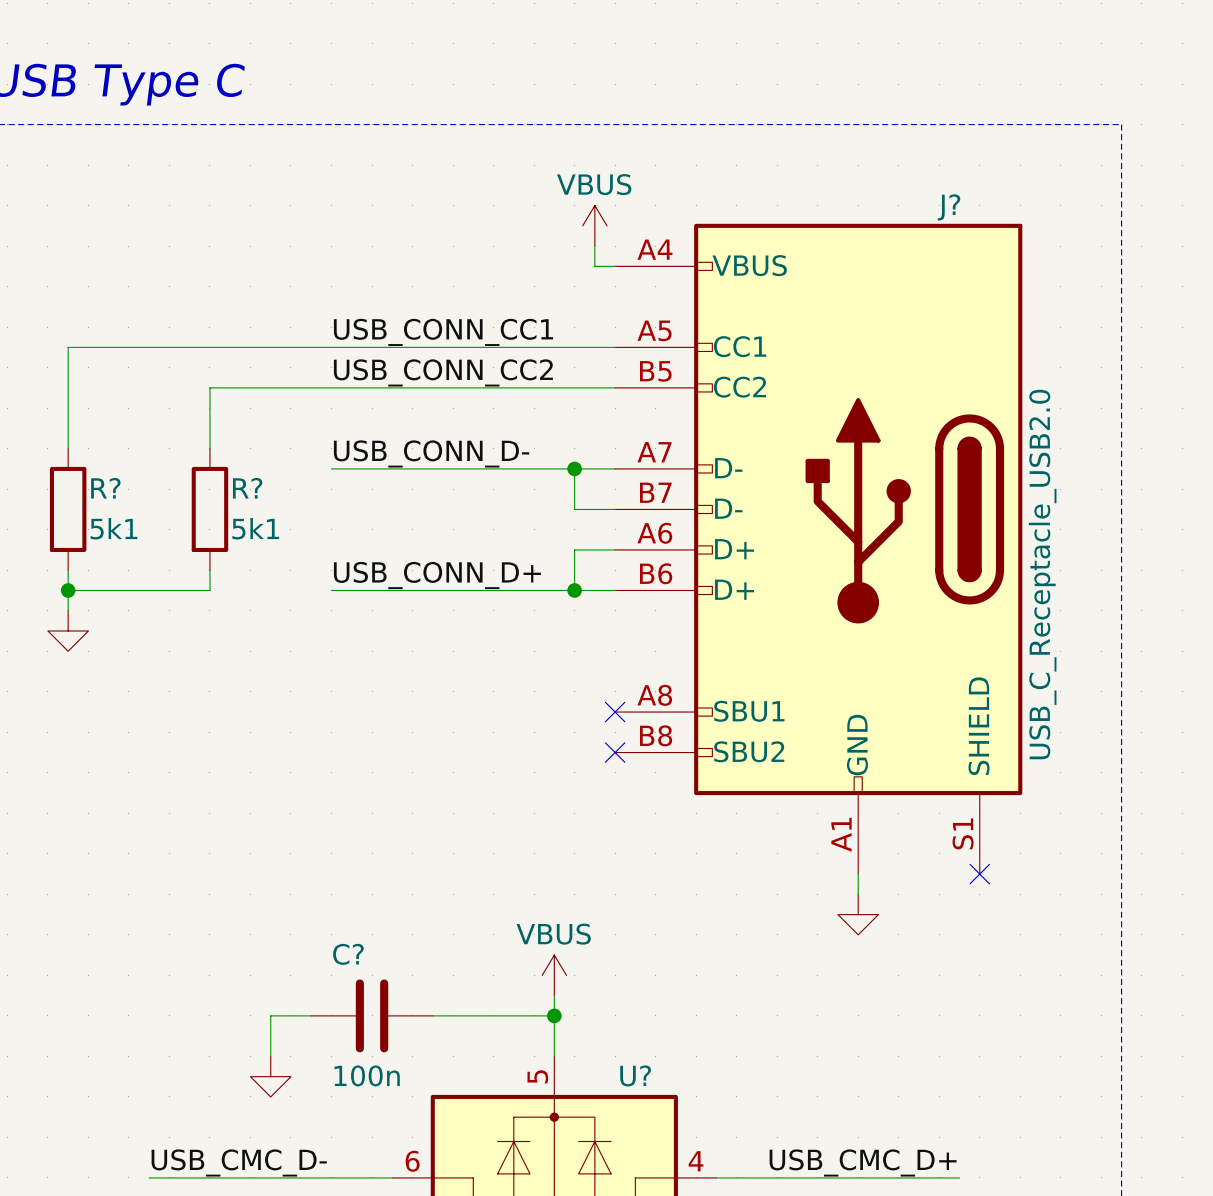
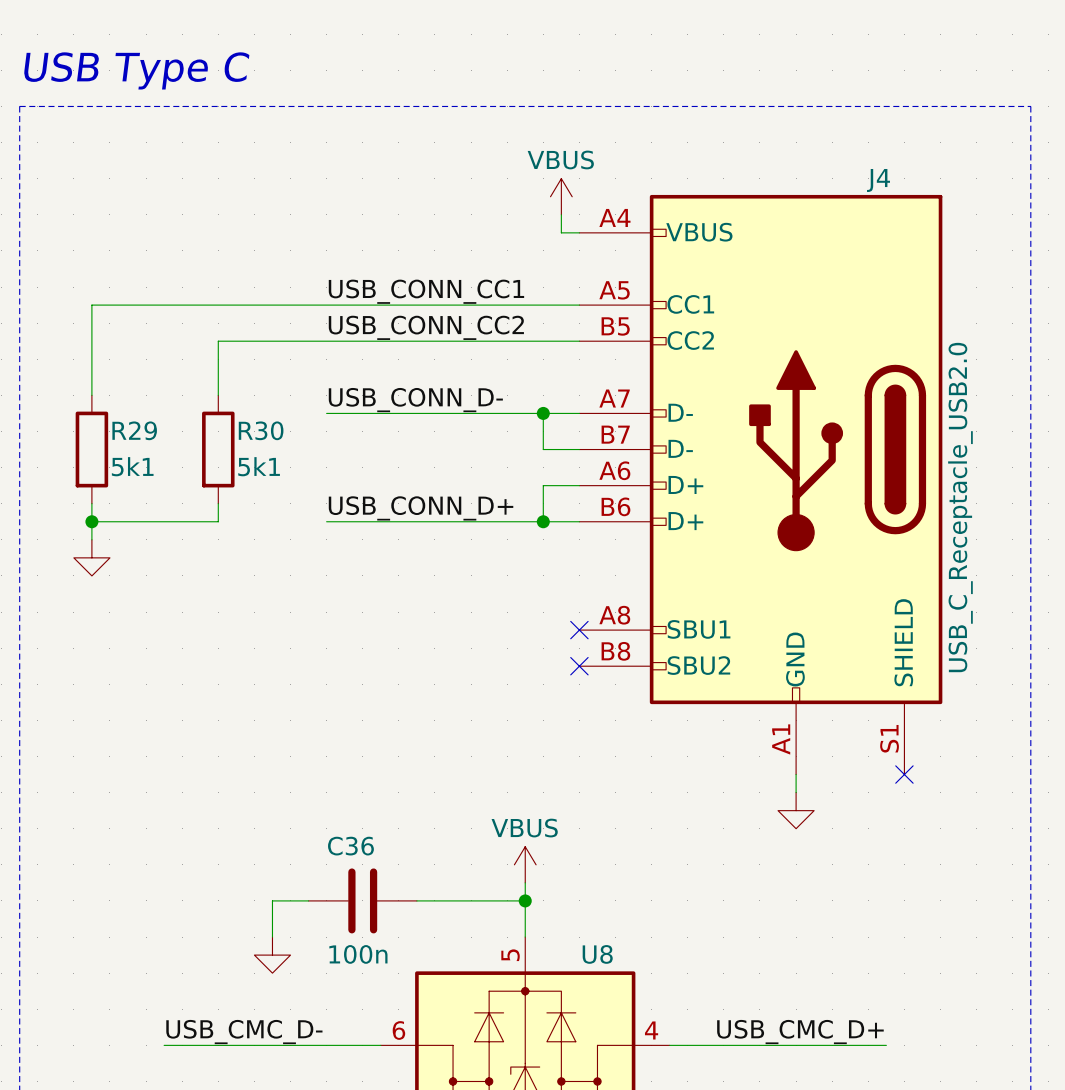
J? name: J? (949, 207) -> J4 (878, 180)
R? name: R? (105, 488) -> R29 (134, 430)
R? name: R? (247, 488) -> R30 (261, 430)
C? name: C? (348, 954) -> C36 (350, 846)
U? name: U? (635, 1075) -> U8 (597, 954)

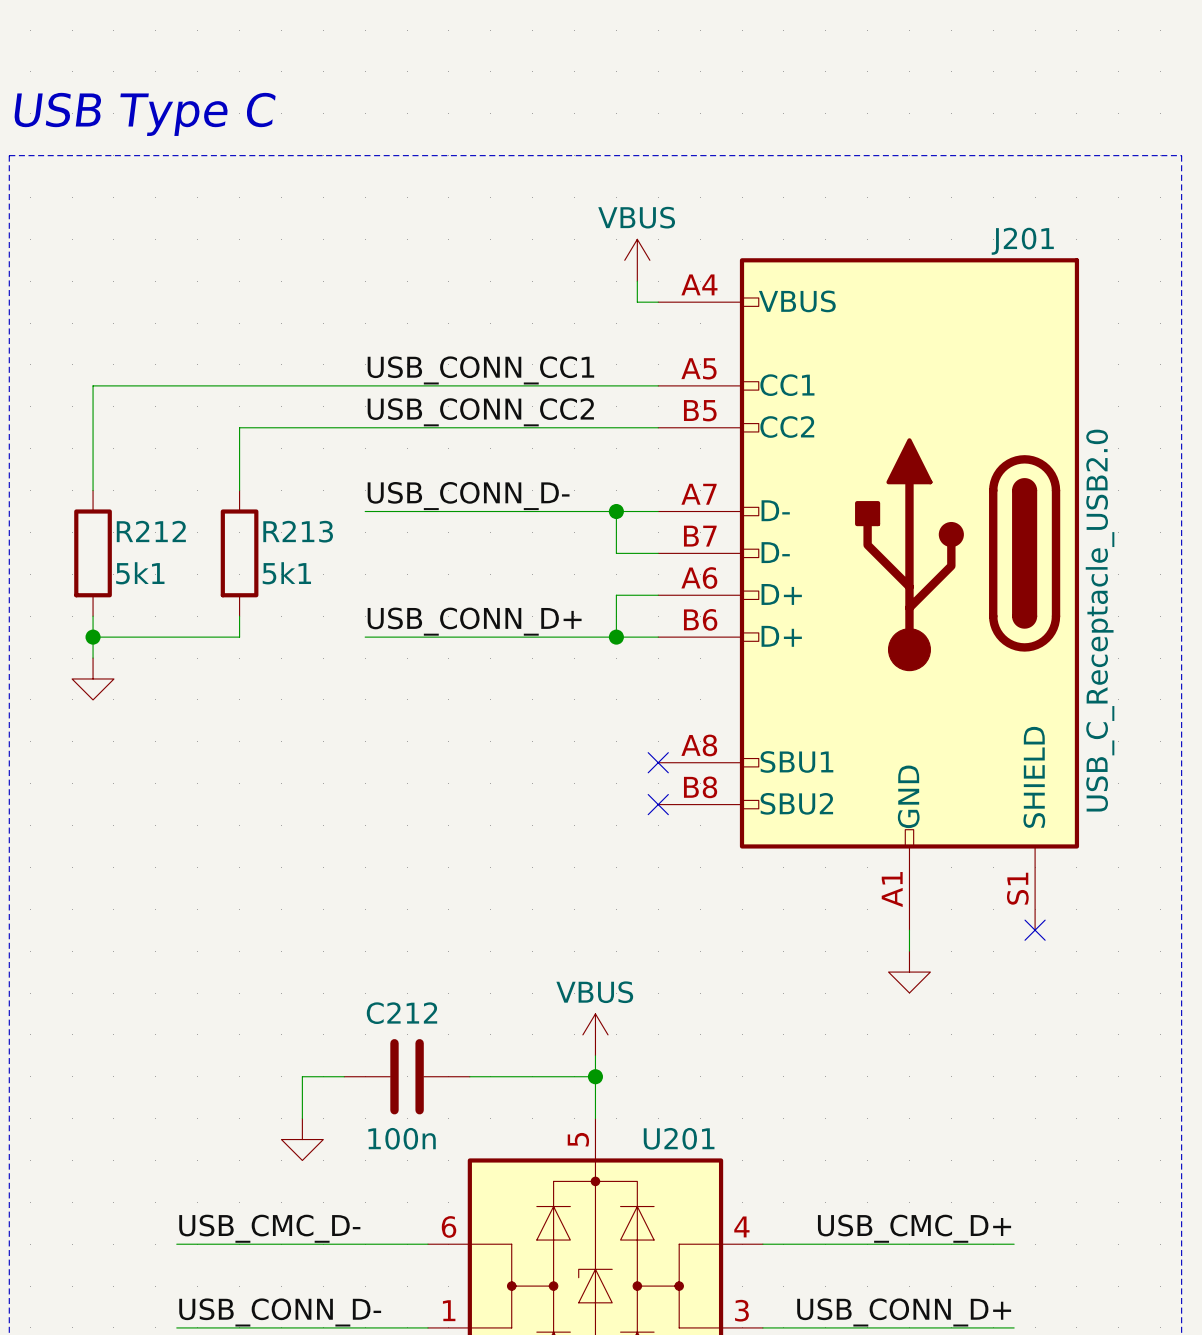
J4 name: J4 (878, 180) -> J201 (1022, 241)
R29 name: R29 (134, 430) -> R212 (151, 531)
R30 name: R30 (261, 430) -> R213 (298, 531)
C36 name: C36 (350, 846) -> C212 (401, 1013)
U8 name: U8 (597, 954) -> U201 (679, 1138)

